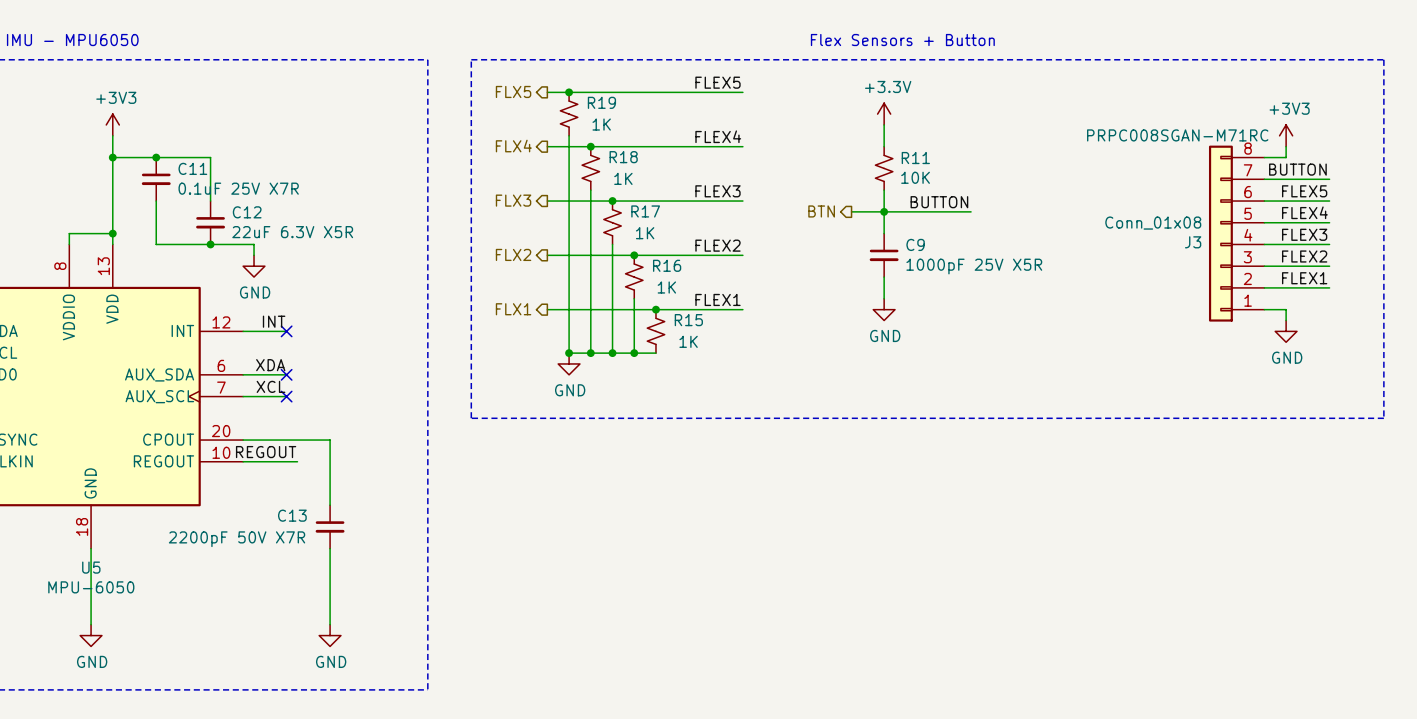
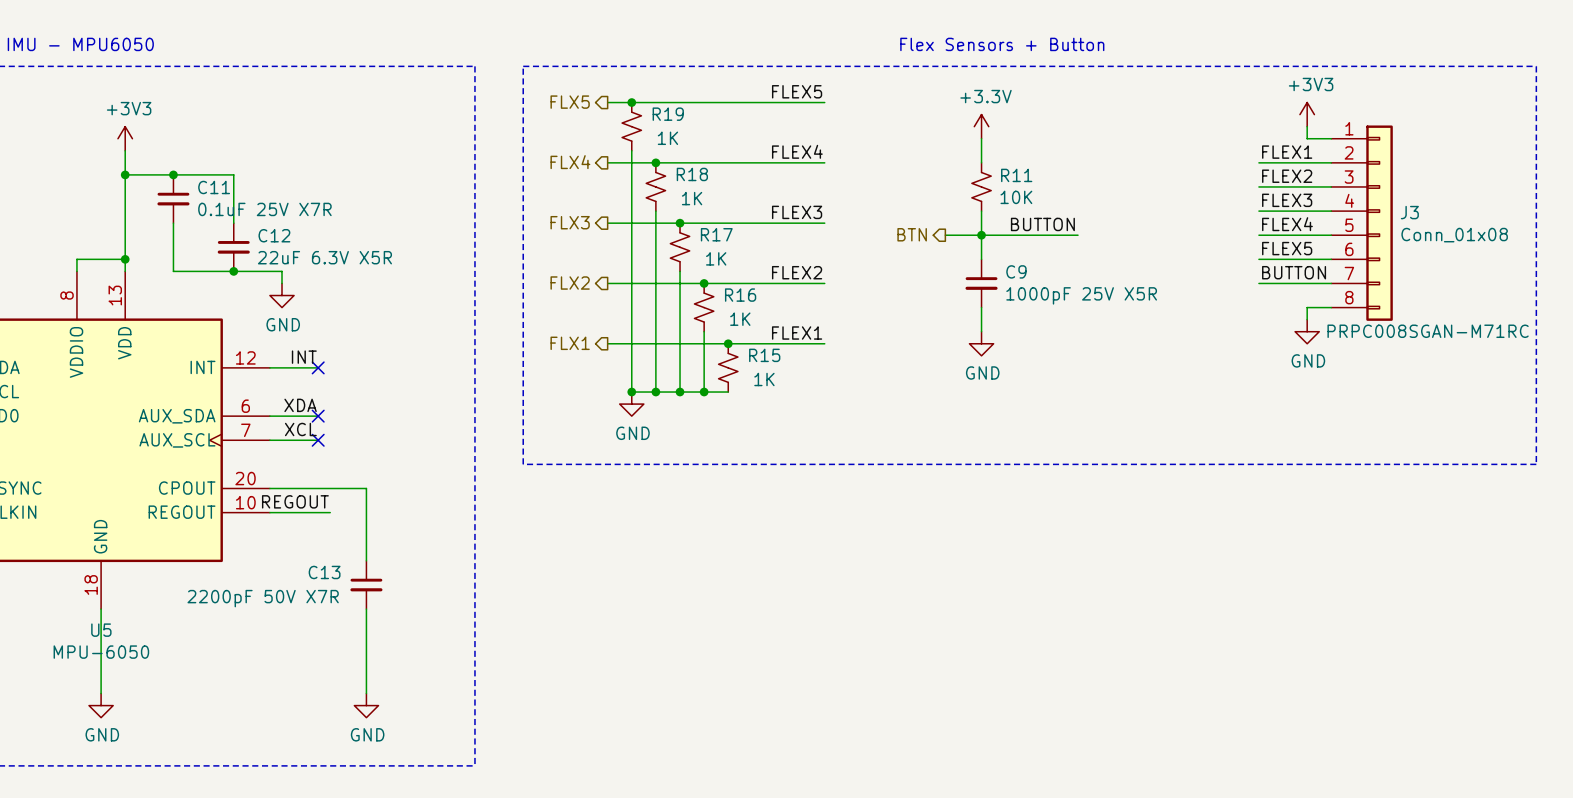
wire: none -> (1307, 126) (1307, 138) (1331, 138)
power symbol position: +3V3 (1286, 135) -> +3V3 (1307, 114)
label: none -> FLEX1 (1287, 152)
wire: (1286, 146) (1286, 157) (1264, 157) -> none
label: none -> FLEX2 (1287, 176)
label position: BUTTON (1297, 169) -> BUTTON (1294, 272)
wire: (1264, 179) (1329, 179) -> (1258, 162) (1331, 162)
label position: FLEX5 (1304, 191) -> FLEX5 (1287, 248)
wire: (1264, 201) (1329, 201) -> (1258, 186) (1331, 186)
label position: FLEX4 (1304, 212) -> FLEX4 (1287, 224)
wire: (1264, 222) (1329, 222) -> (1258, 211) (1331, 211)
J3 rotation: 0° (1220, 233) -> 180° (1379, 223)
label position: FLEX3 (1304, 234) -> FLEX3 (1287, 200)
wire: (1264, 244) (1329, 244) -> (1258, 235) (1331, 235)
label: FLEX2 (1304, 256) -> none
wire: (1264, 266) (1329, 266) -> (1258, 259) (1331, 259)
wire: none -> (1331, 307) (1307, 307) (1307, 319)
label: FLEX1 (1304, 278) -> none
wire: (1264, 287) (1329, 287) -> (1258, 283) (1331, 283)
wire: (1264, 309) (1286, 309) (1286, 320) -> none
power symbol position: GND (1286, 331) -> GND (1307, 331)

